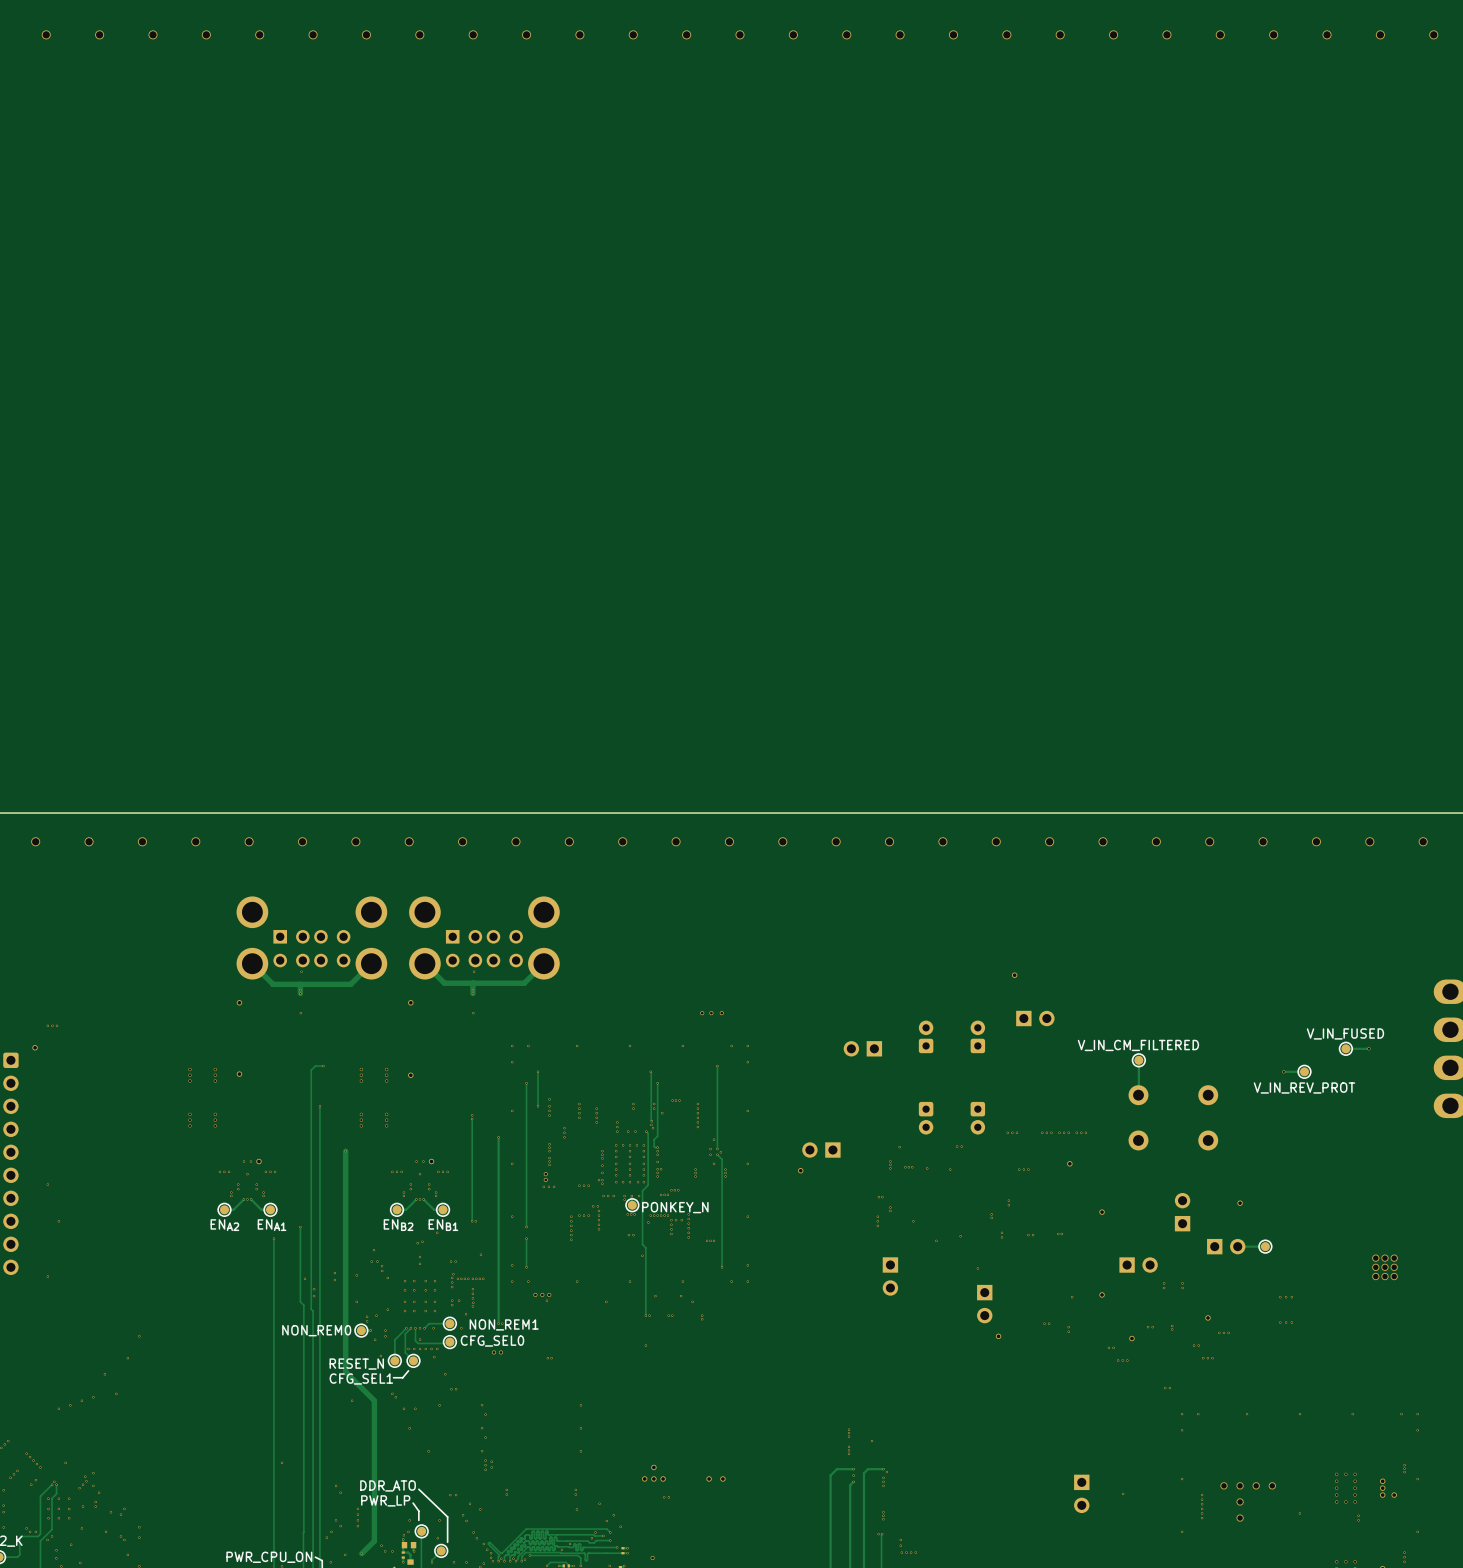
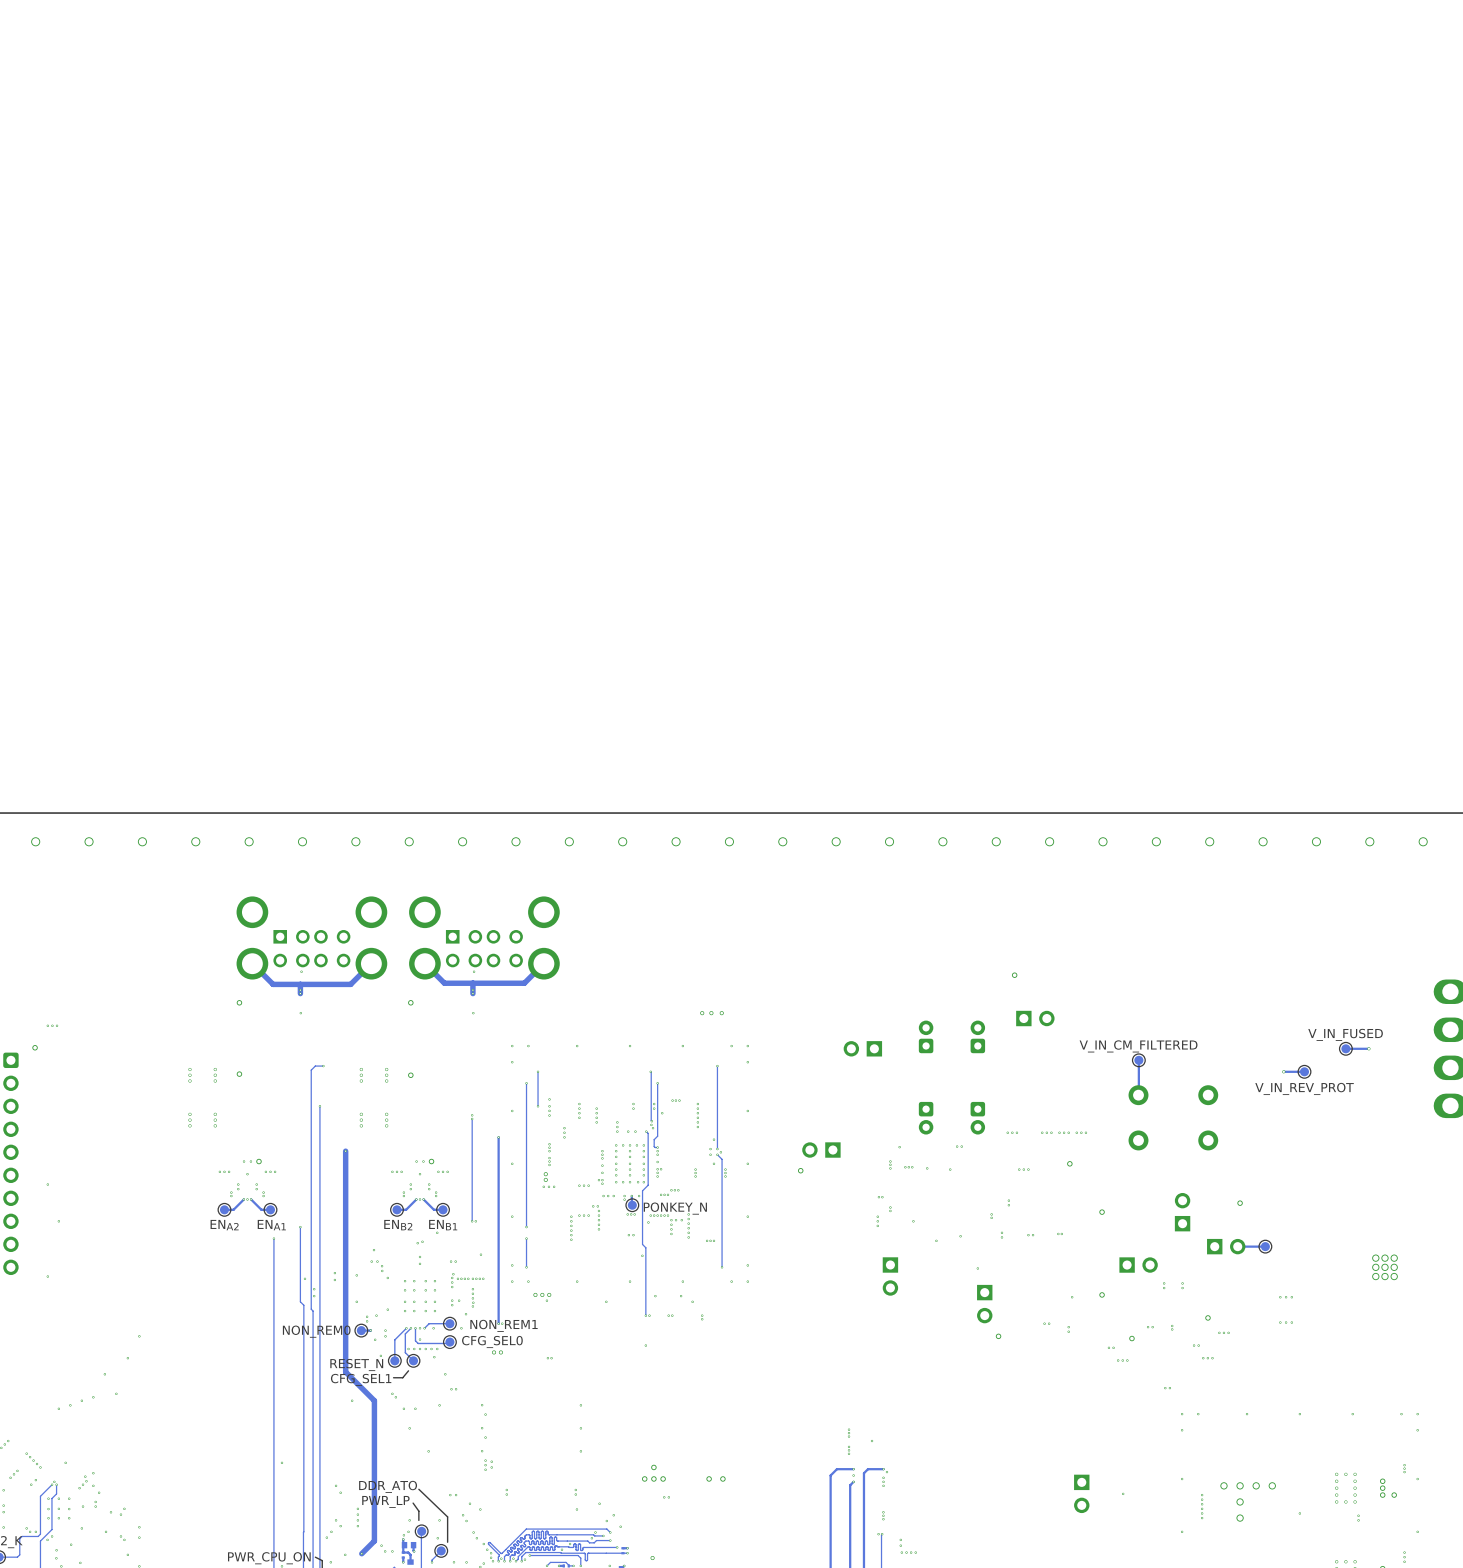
via: (46, 34) -> none
via: (99, 34) -> none
via: (152, 34) -> none
via: (206, 34) -> none
via: (259, 34) -> none
via: (313, 34) -> none
via: (366, 34) -> none
via: (419, 34) -> none
via: (473, 34) -> none
via: (526, 34) -> none
via: (579, 34) -> none
via: (633, 34) -> none
via: (686, 34) -> none
via: (740, 34) -> none
via: (793, 34) -> none
via: (846, 34) -> none
via: (900, 34) -> none
via: (953, 34) -> none
via: (1006, 34) -> none
via: (1060, 34) -> none
via: (1113, 34) -> none
via: (1166, 34) -> none
via: (1220, 34) -> none
via: (1273, 34) -> none
via: (1327, 34) -> none
via: (1380, 34) -> none
via: (1433, 34) -> none

